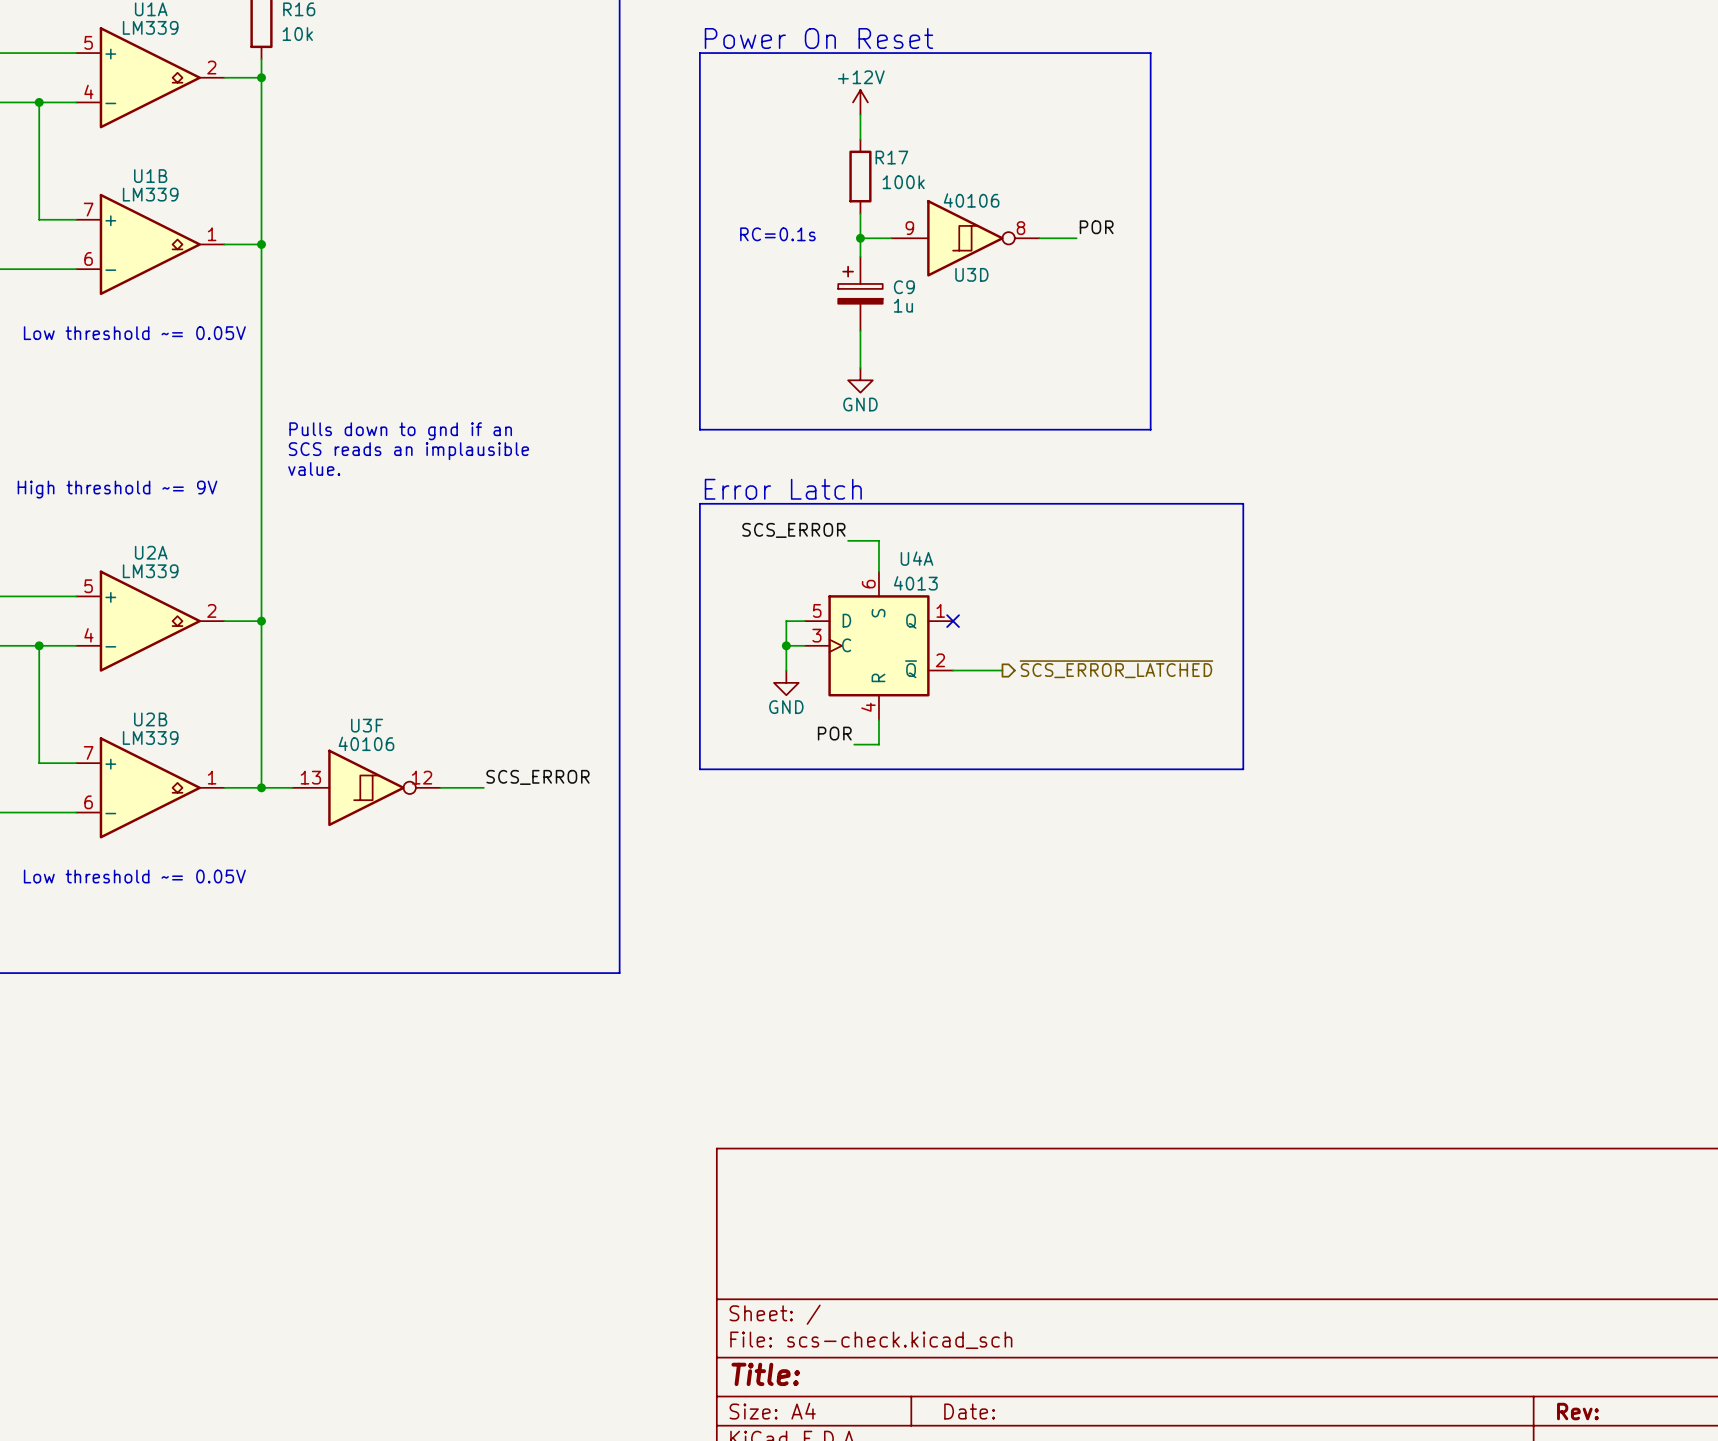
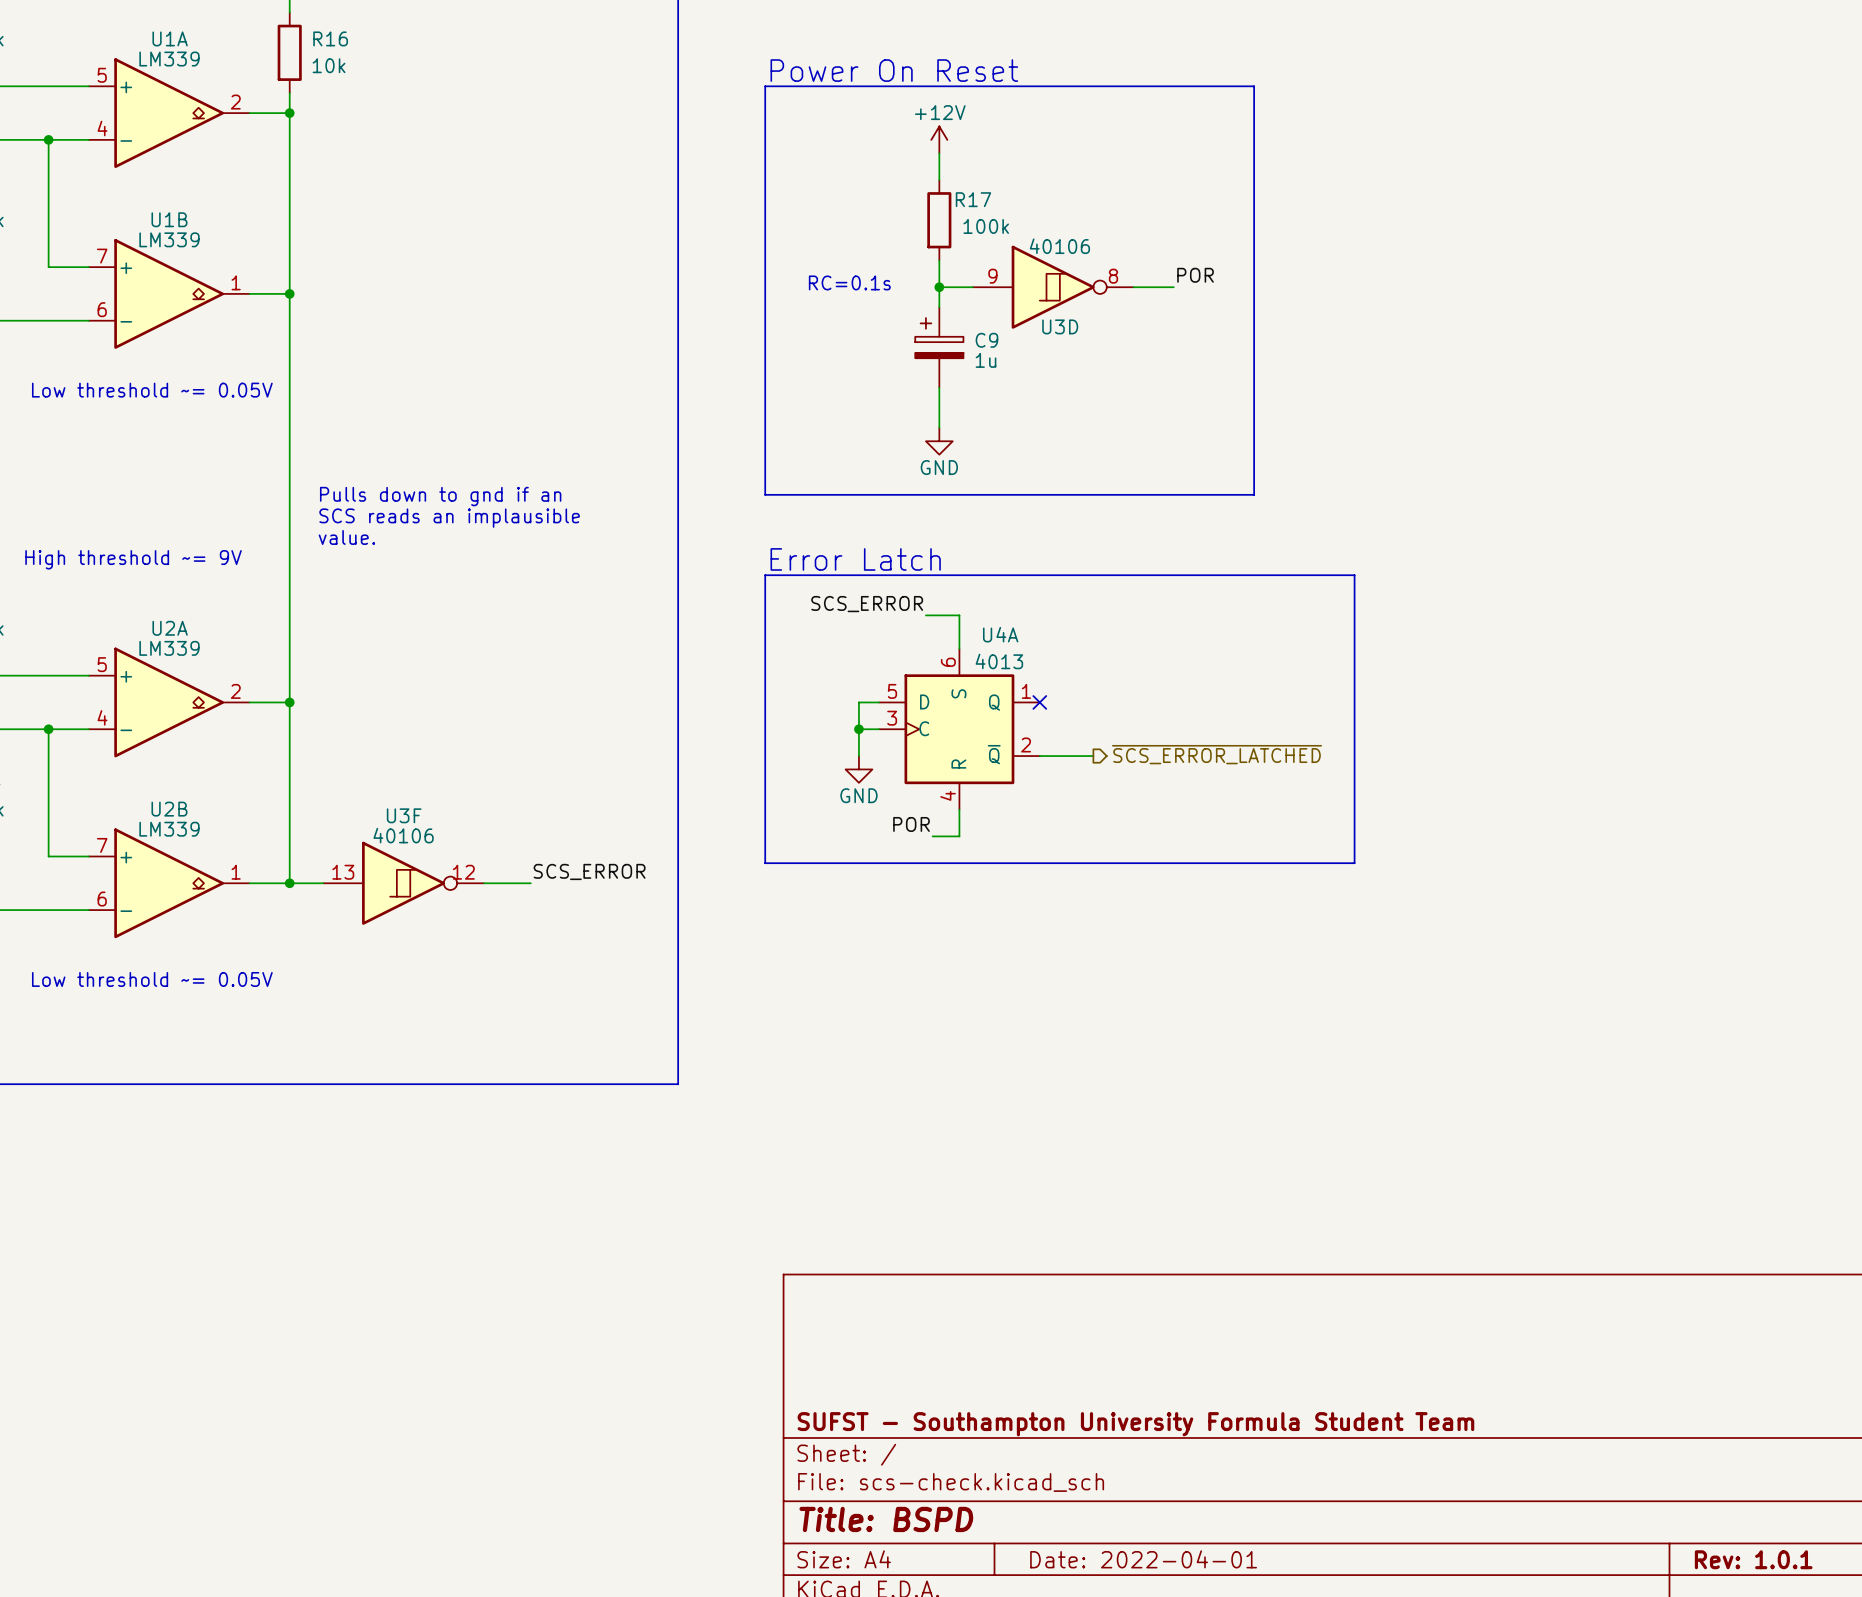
title block: none -> SUFST - Southampton University Formula Student Team (1135, 1424)
title block: Title: (765, 1374) -> Title: BSPD (886, 1519)
title block: Date: (969, 1411) -> Date: 2022-04-01 (1143, 1559)
title block: Rev: (1577, 1411) -> Rev: 1.0.1 (1753, 1559)

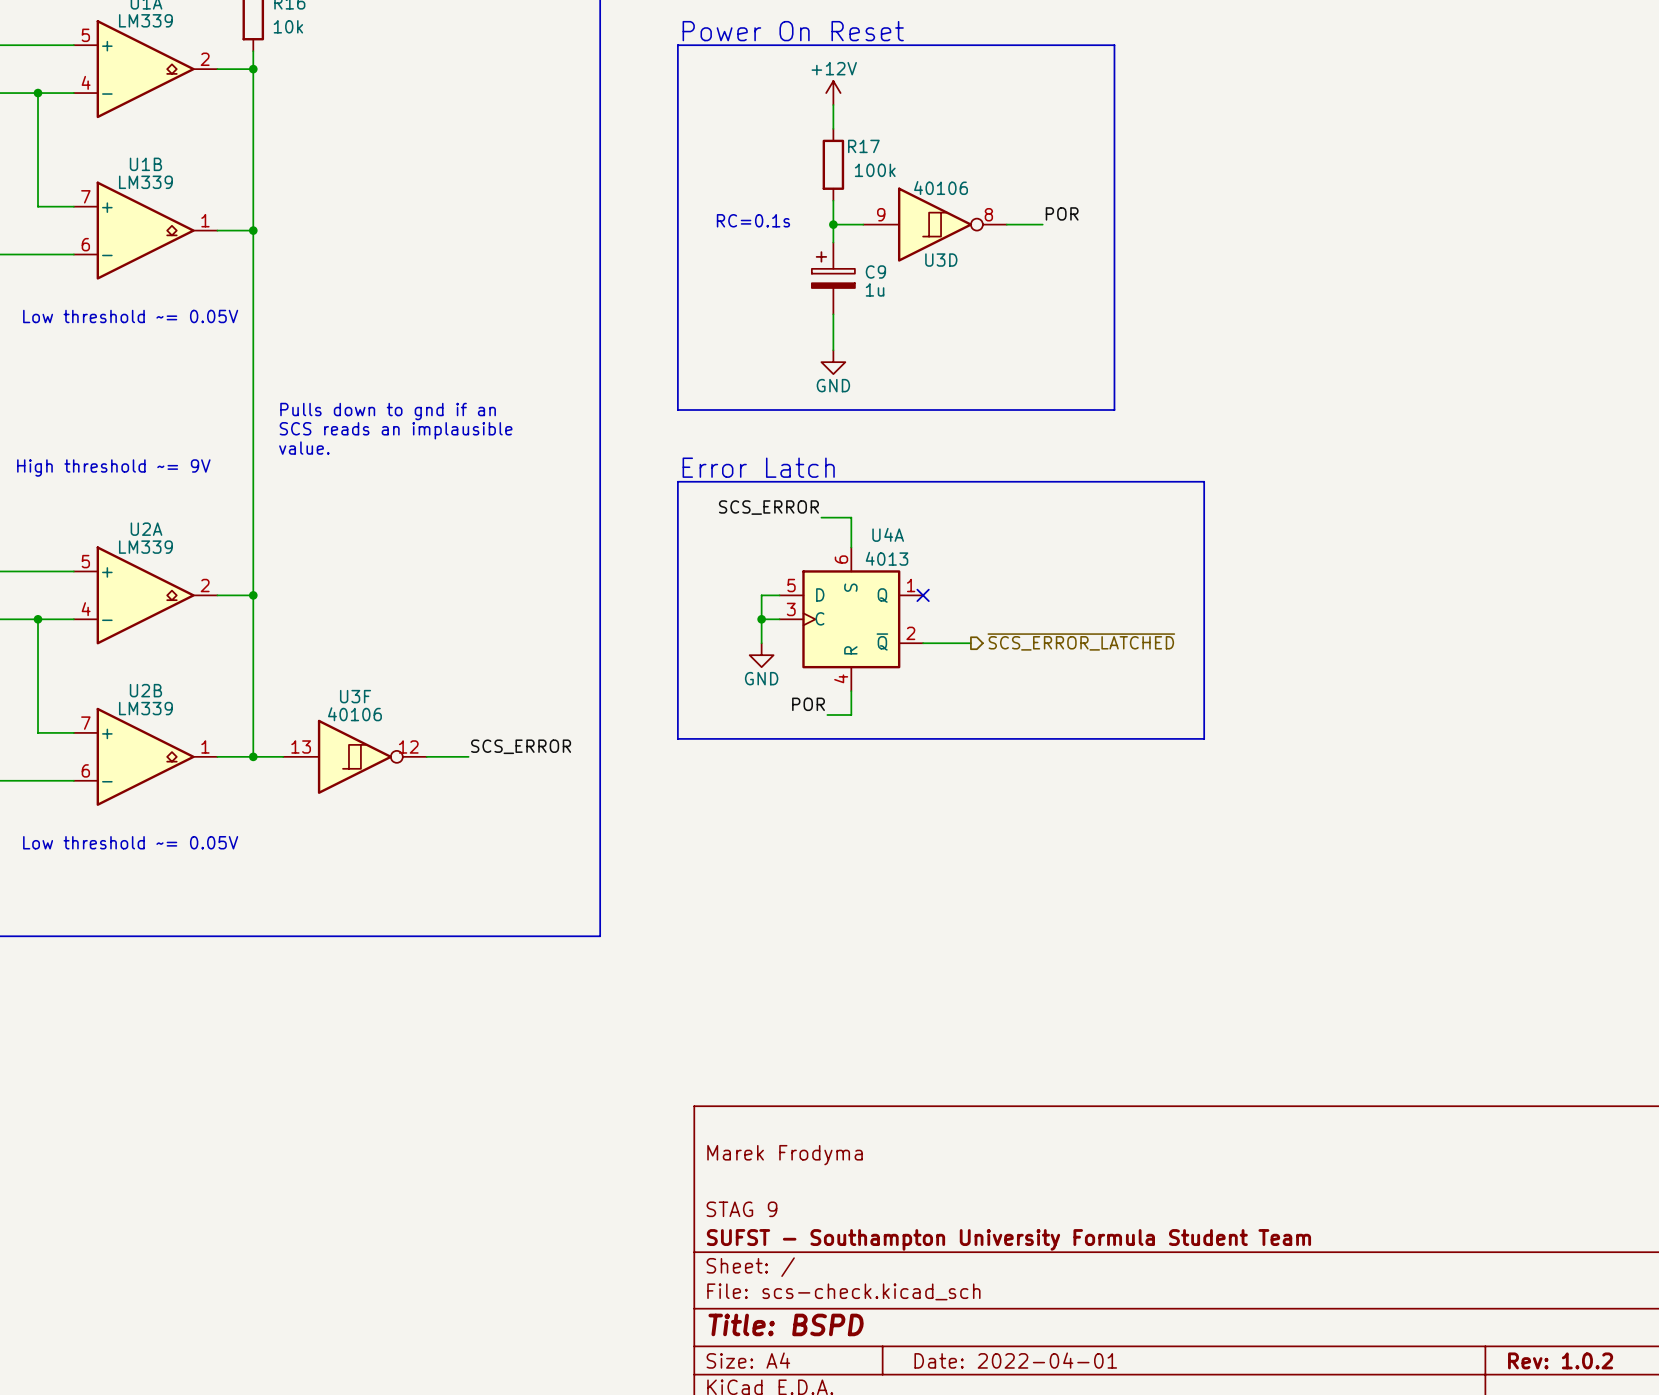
title block: none -> Marek Frodyma (785, 1155)
title block: none -> STAG 9 (741, 1209)
title block: Rev: 1.0.1 (1753, 1559) -> Rev: 1.0.2 (1560, 1360)

